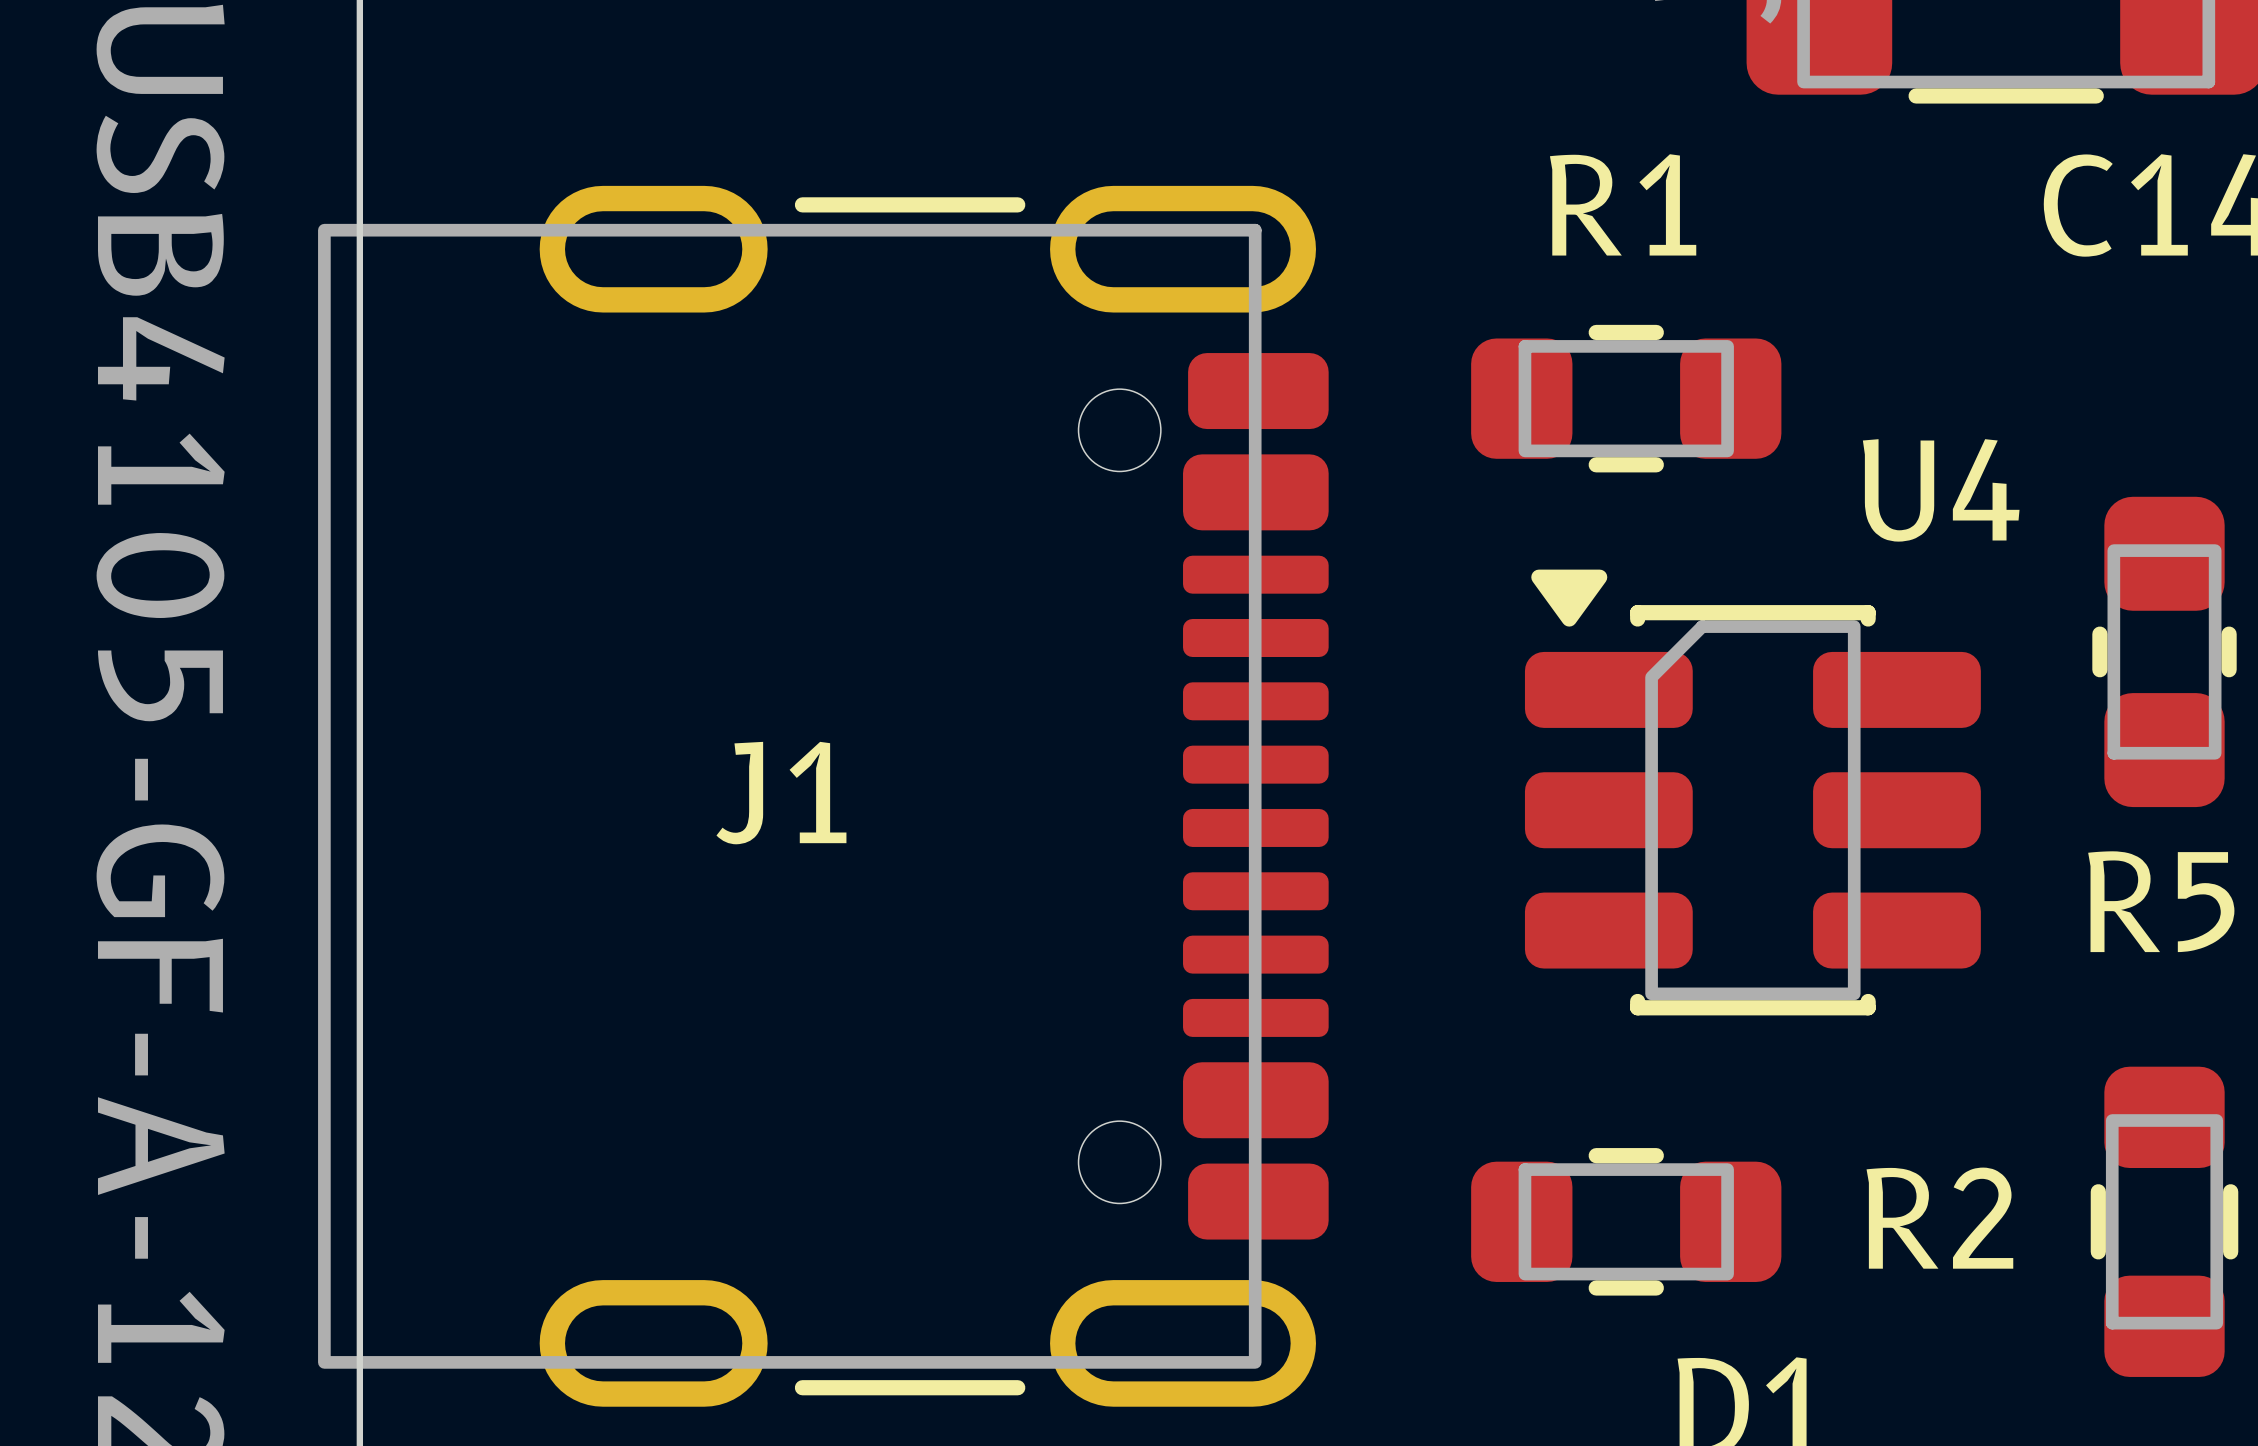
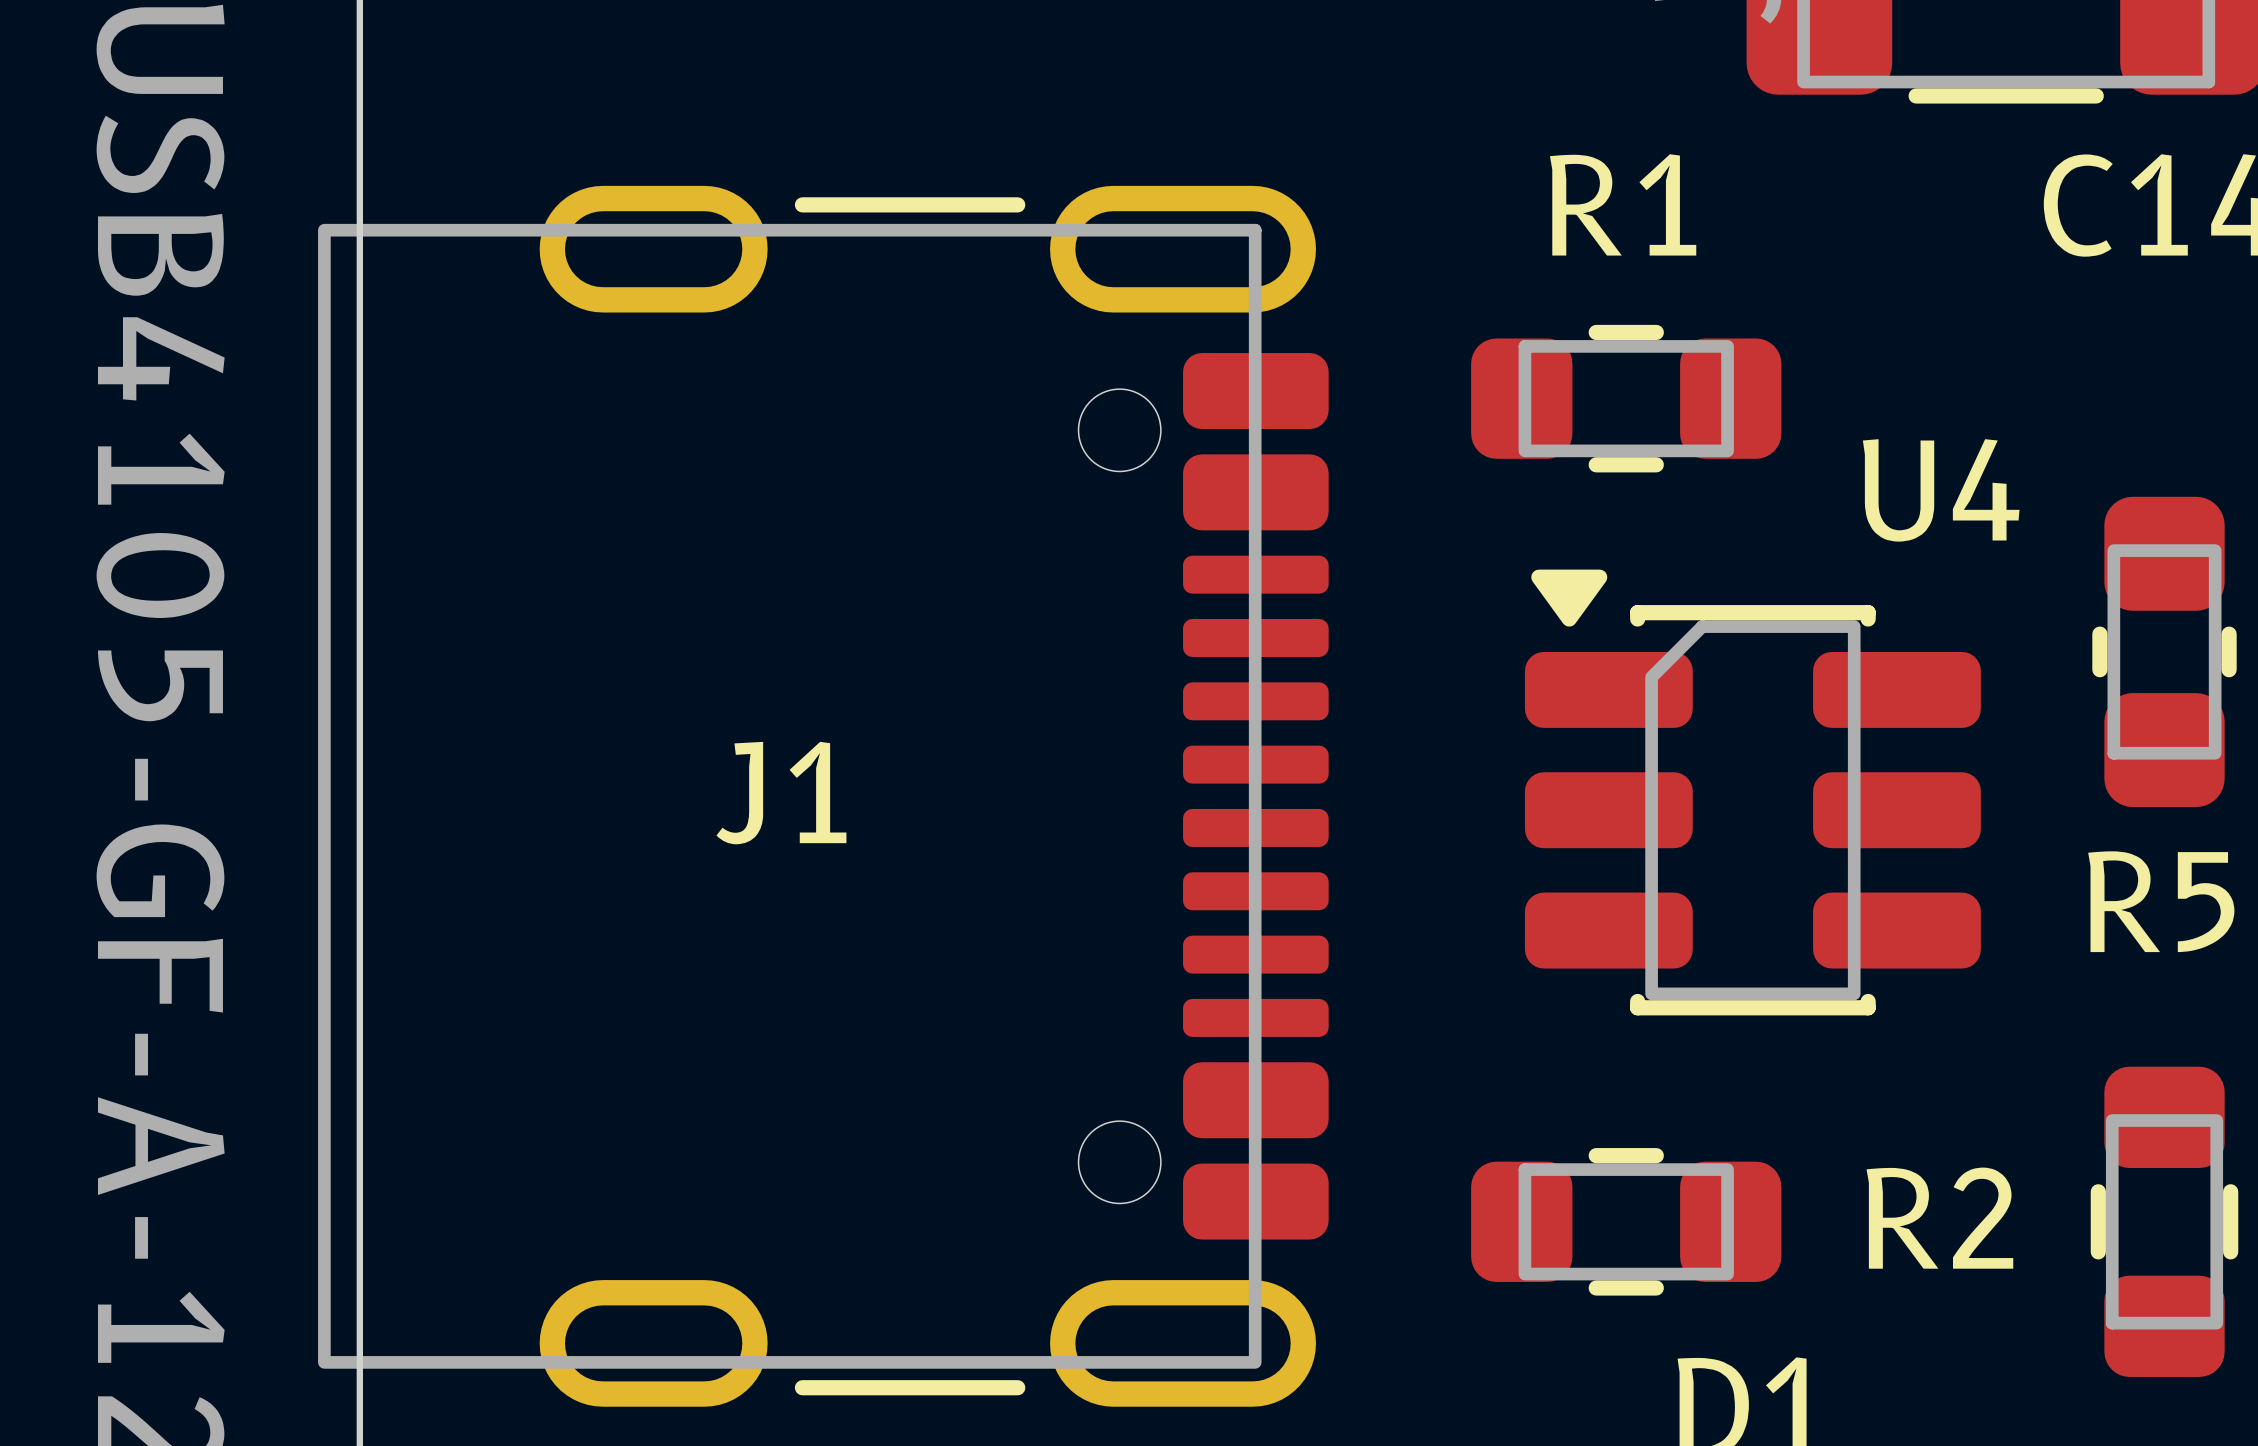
J1 footprint: [318, 185, 1329, 1407] -> [318, 185, 1329, 1407]

